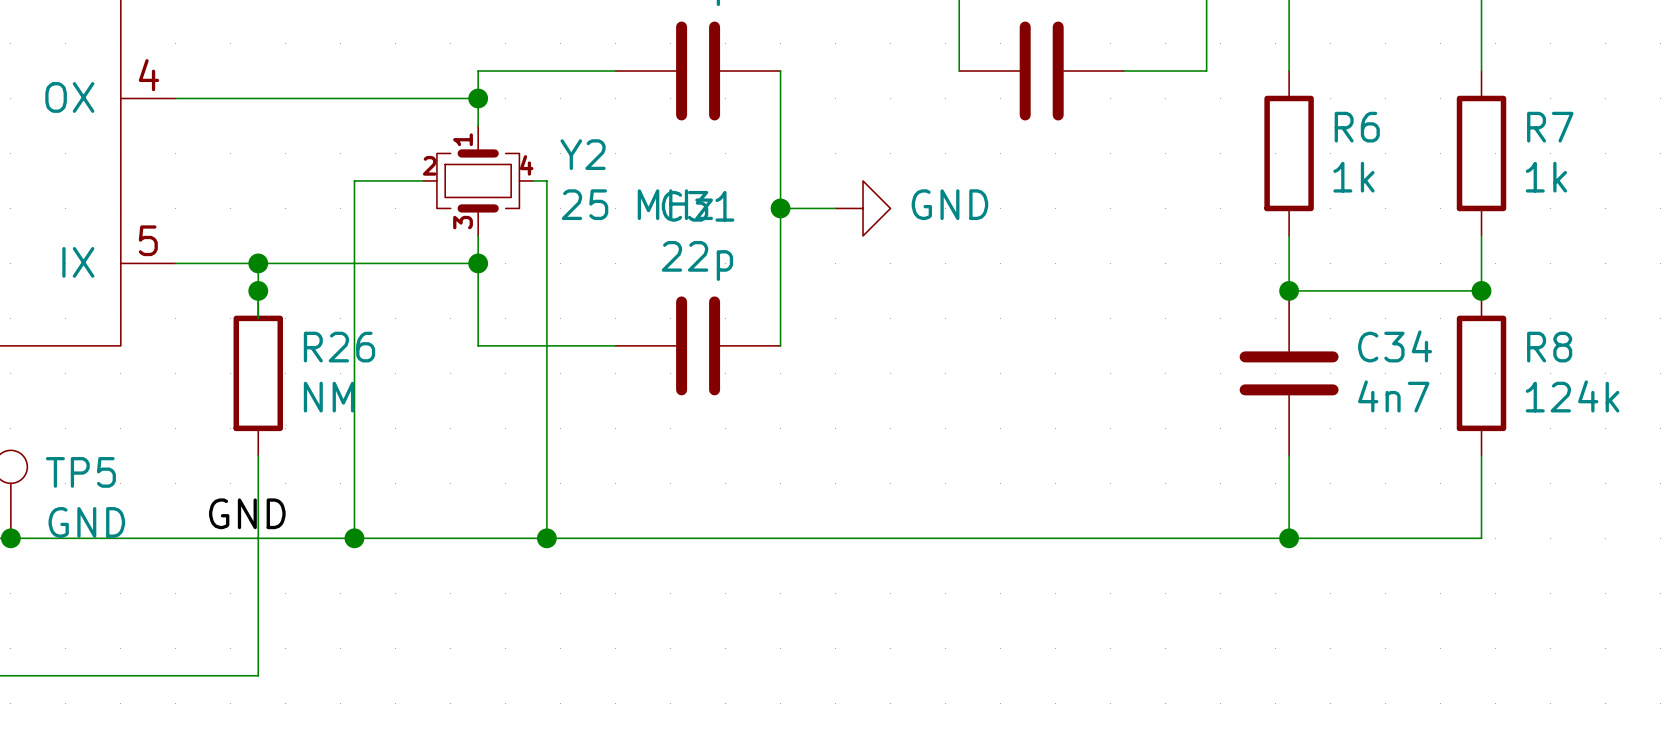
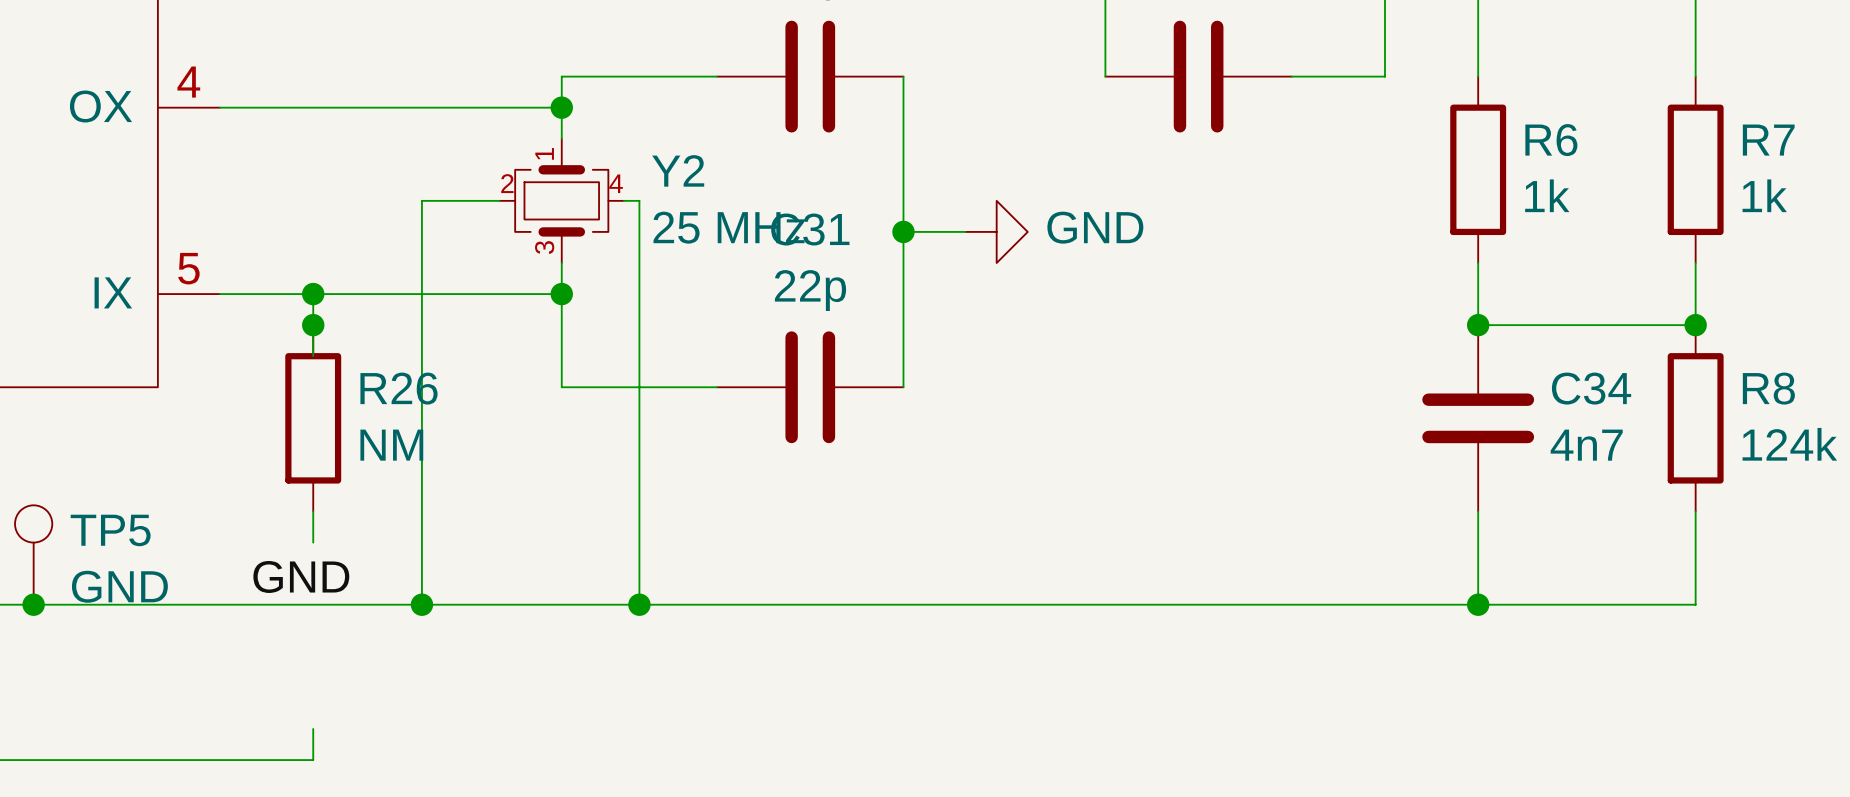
wire: (258, 483) (258, 648) -> none

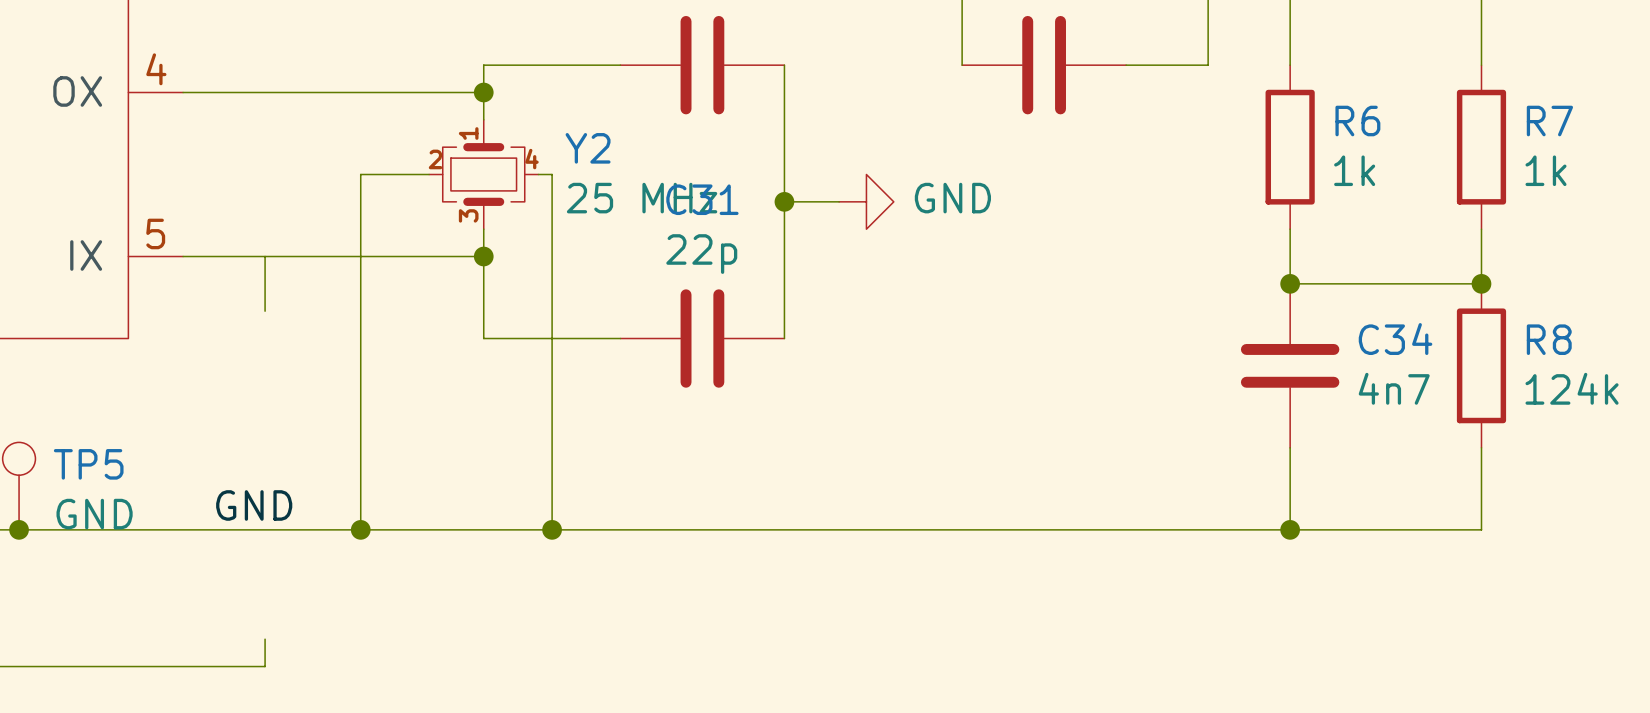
junction: (313, 294) -> none
junction: (313, 325) -> none
R26: NM (313, 418) -> none
wire: (313, 511) (313, 542) -> none

